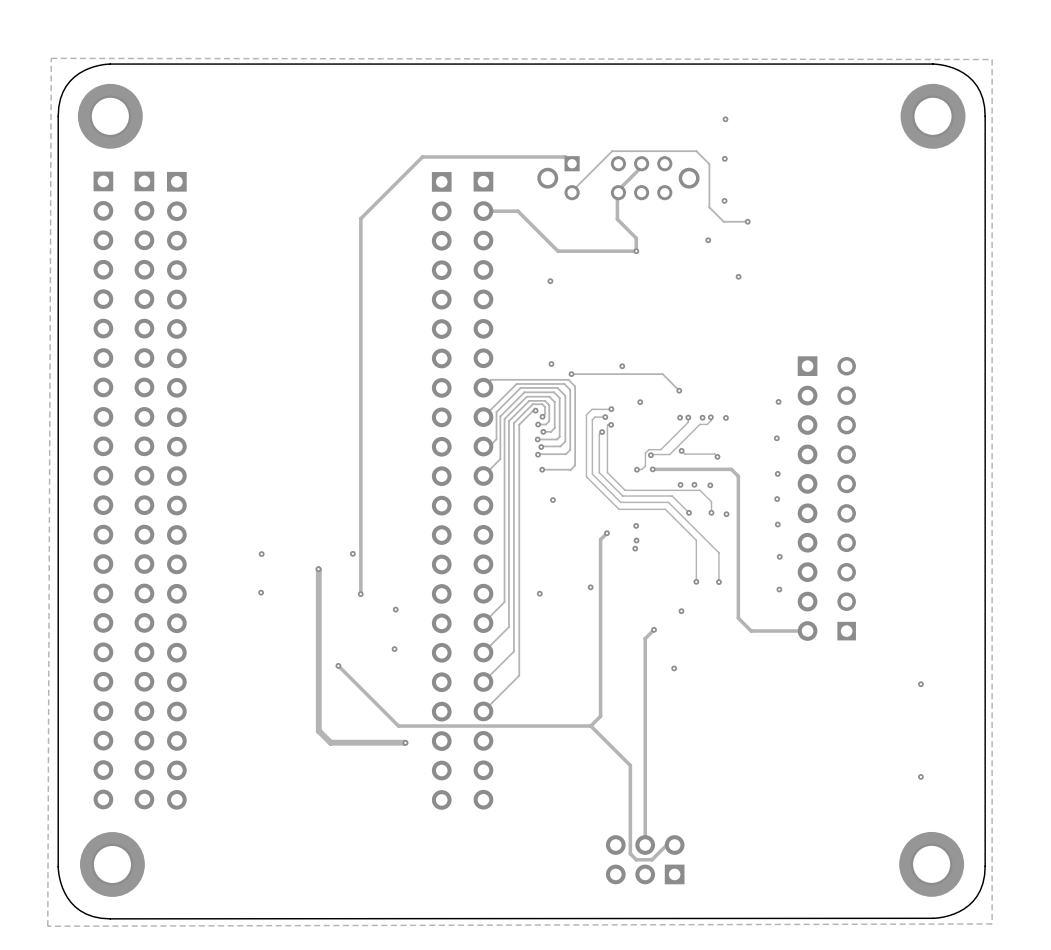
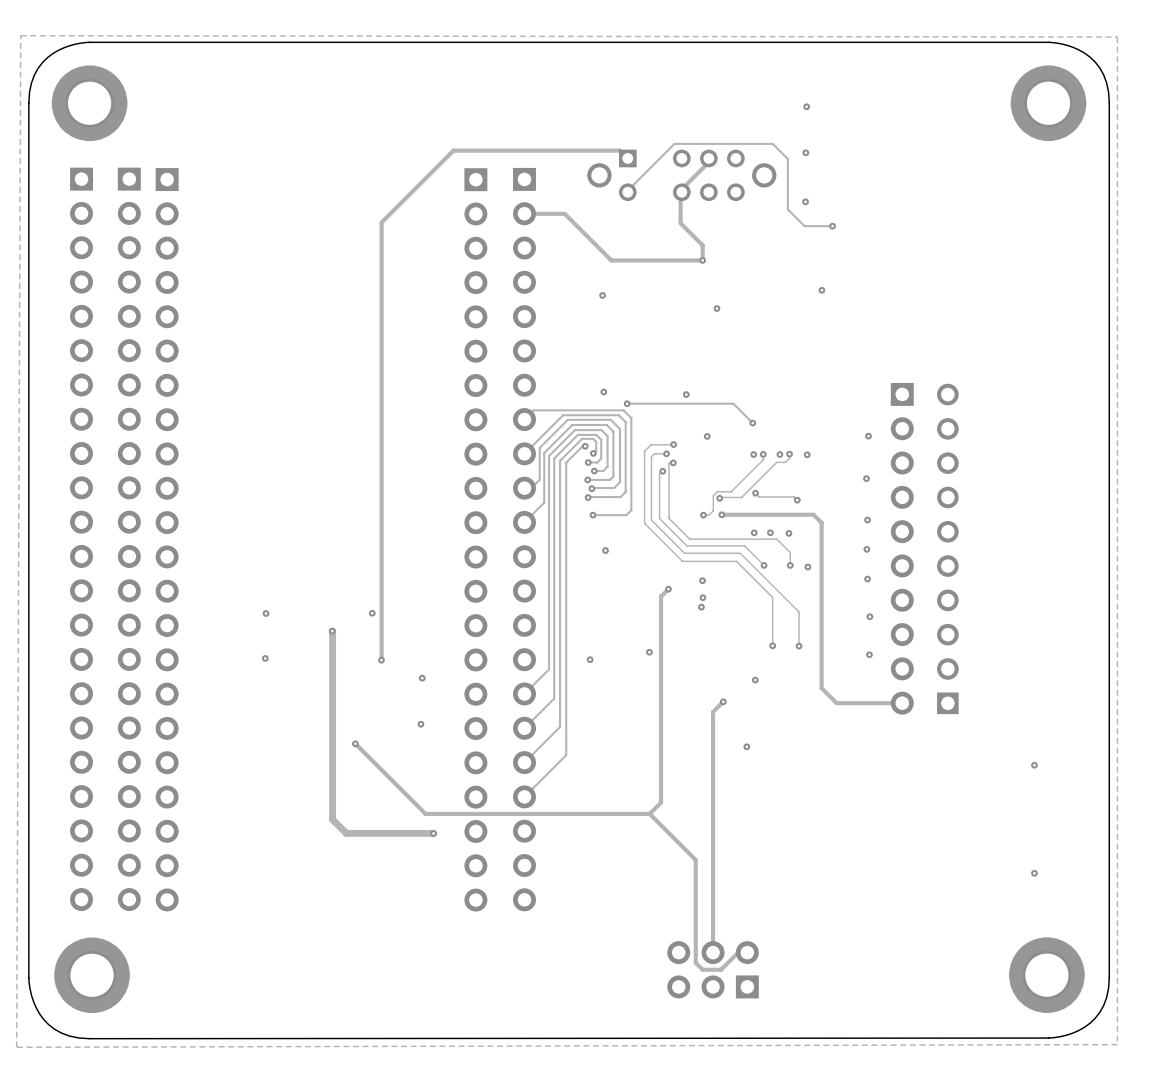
via: (708, 240) -> none
via: none -> (716, 308)

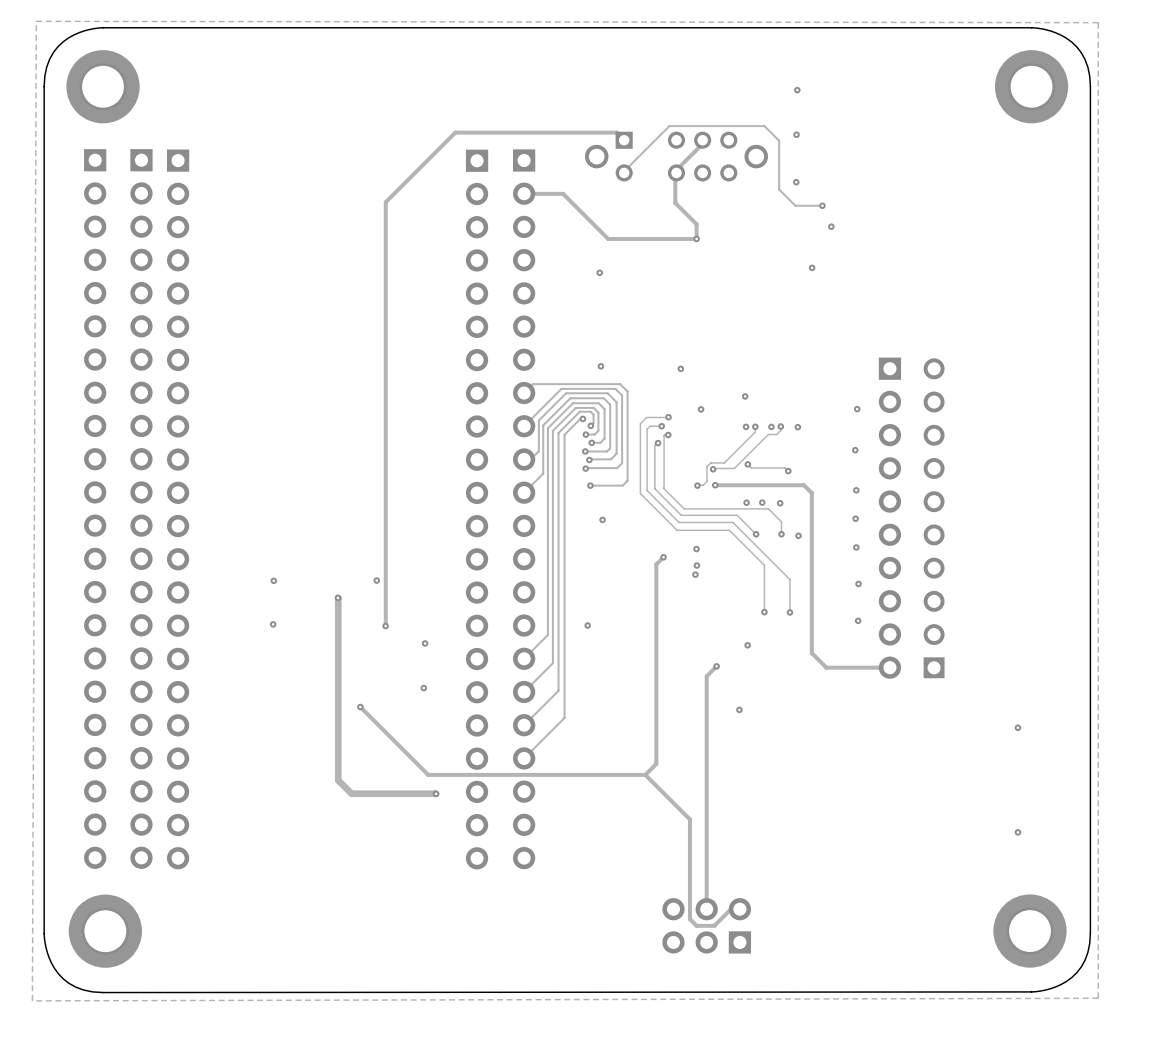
via: none -> (831, 226)
via: (716, 308) -> none
track: (627, 403) (733, 403) (752, 423) -> none
via: (627, 403) -> none
via: (649, 652) -> none

